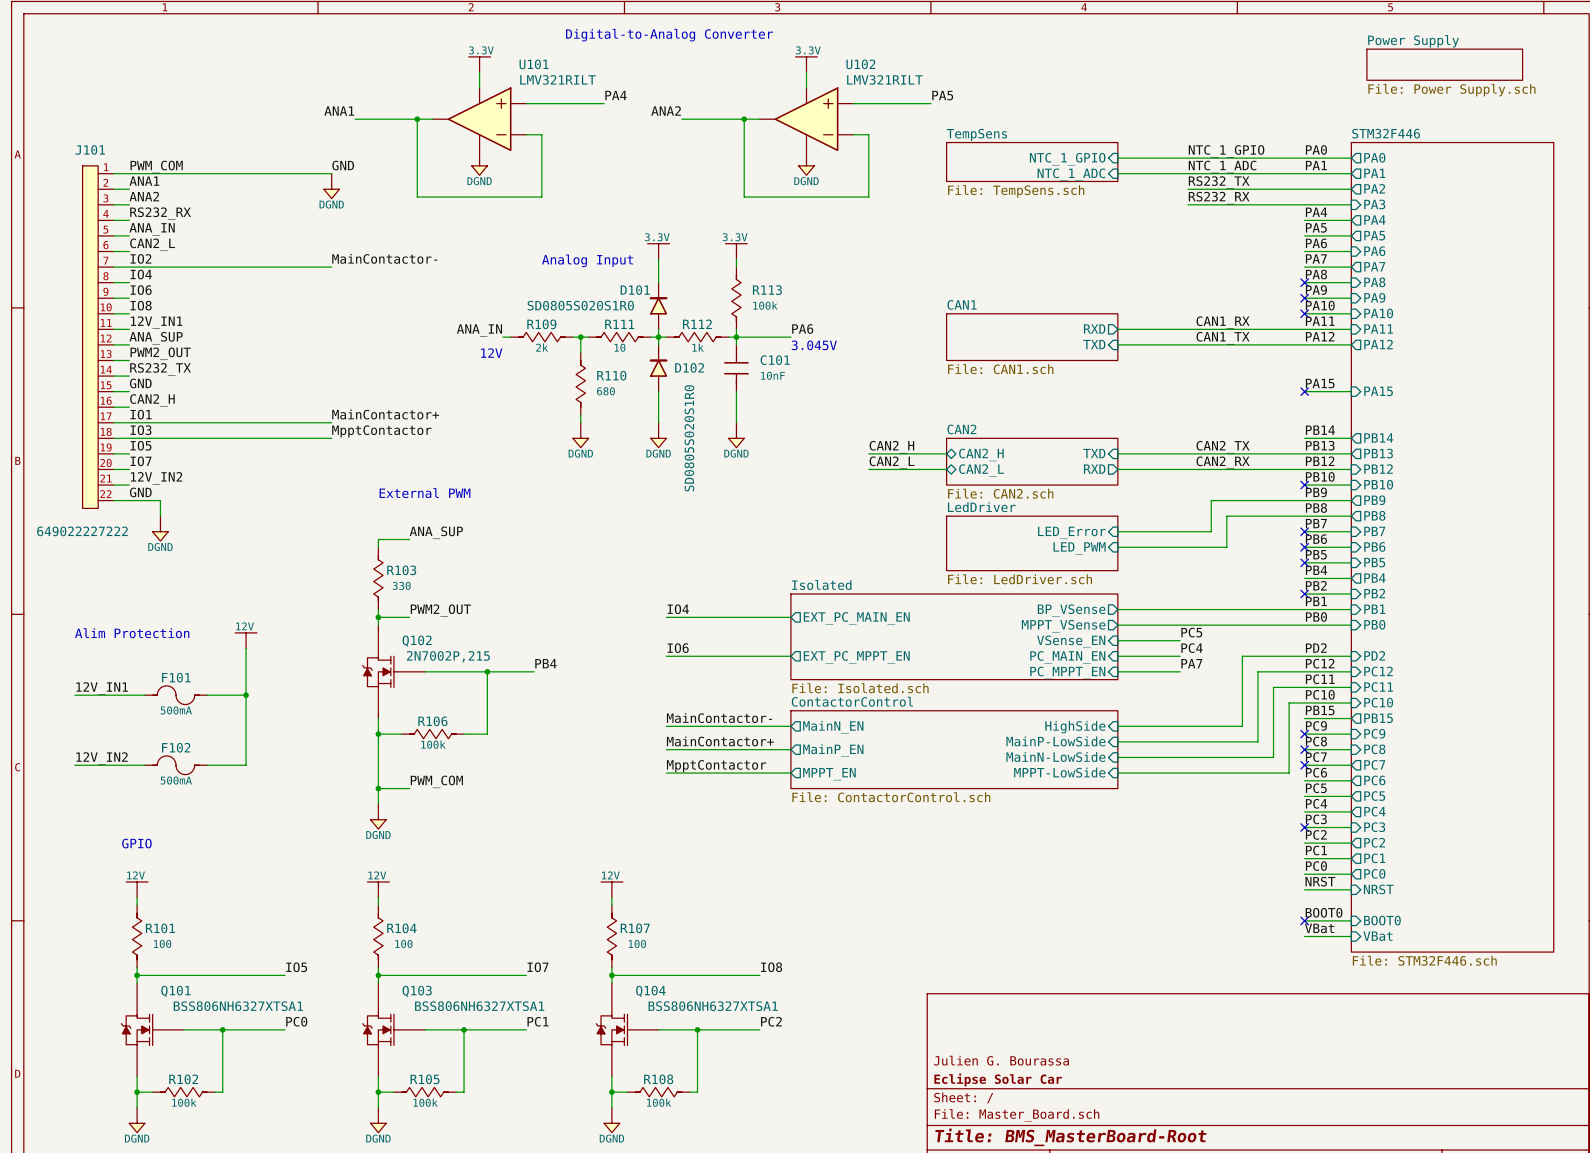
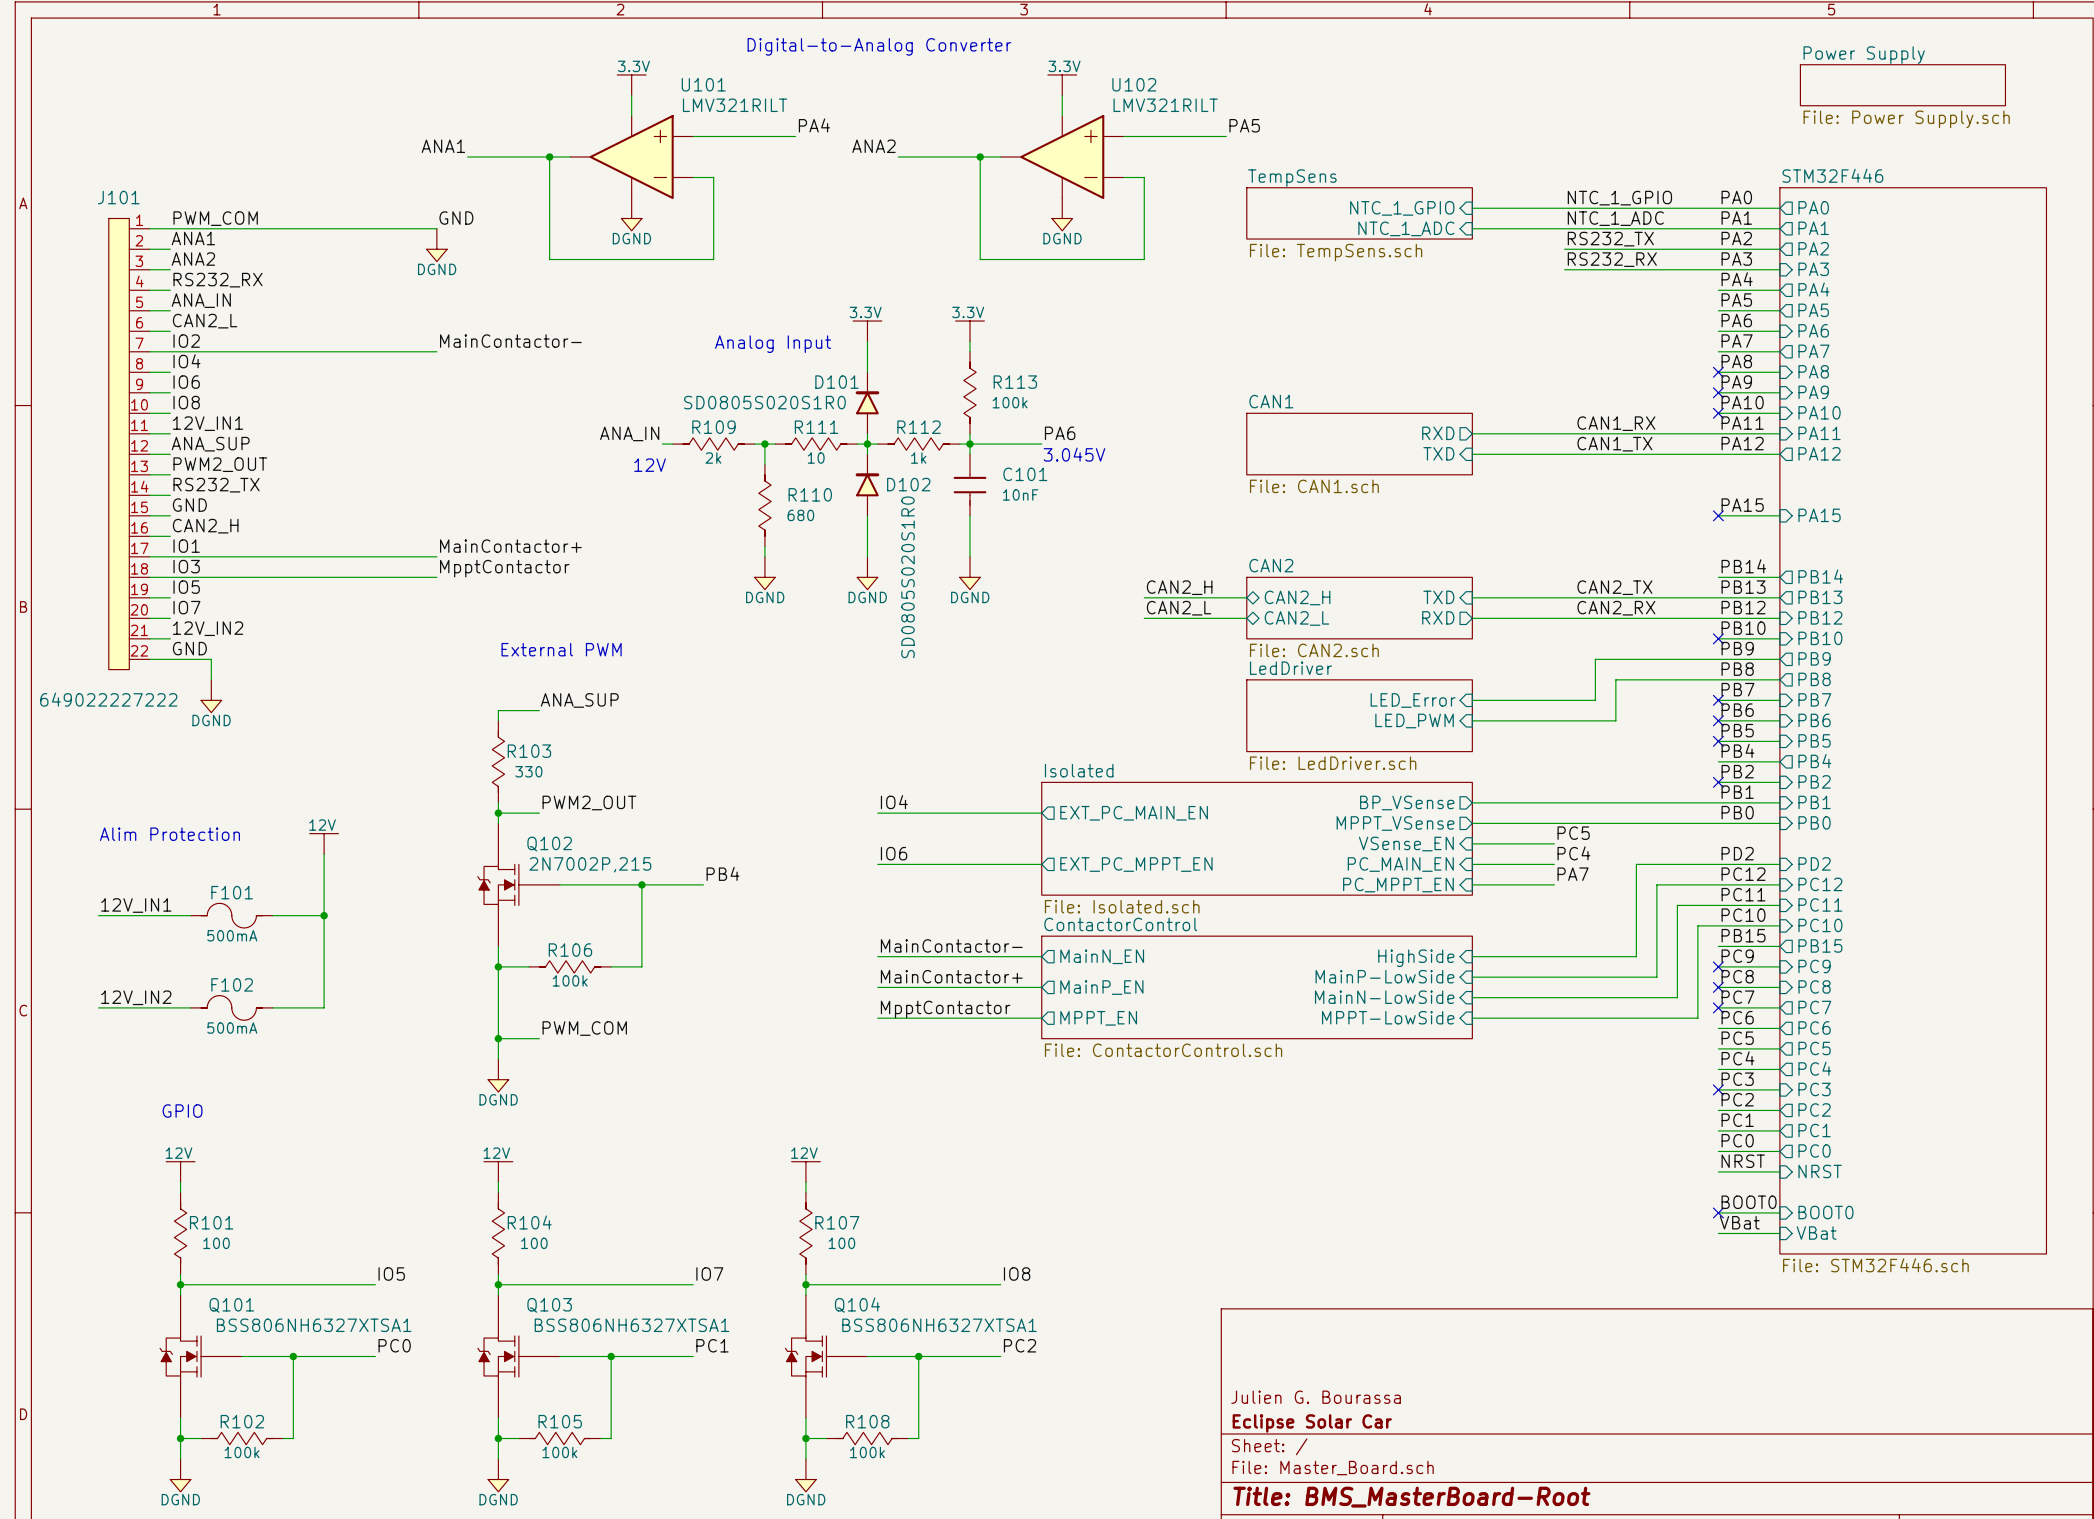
label: none -> PA2 (1736, 238)
label: none -> PA3 (1736, 259)

